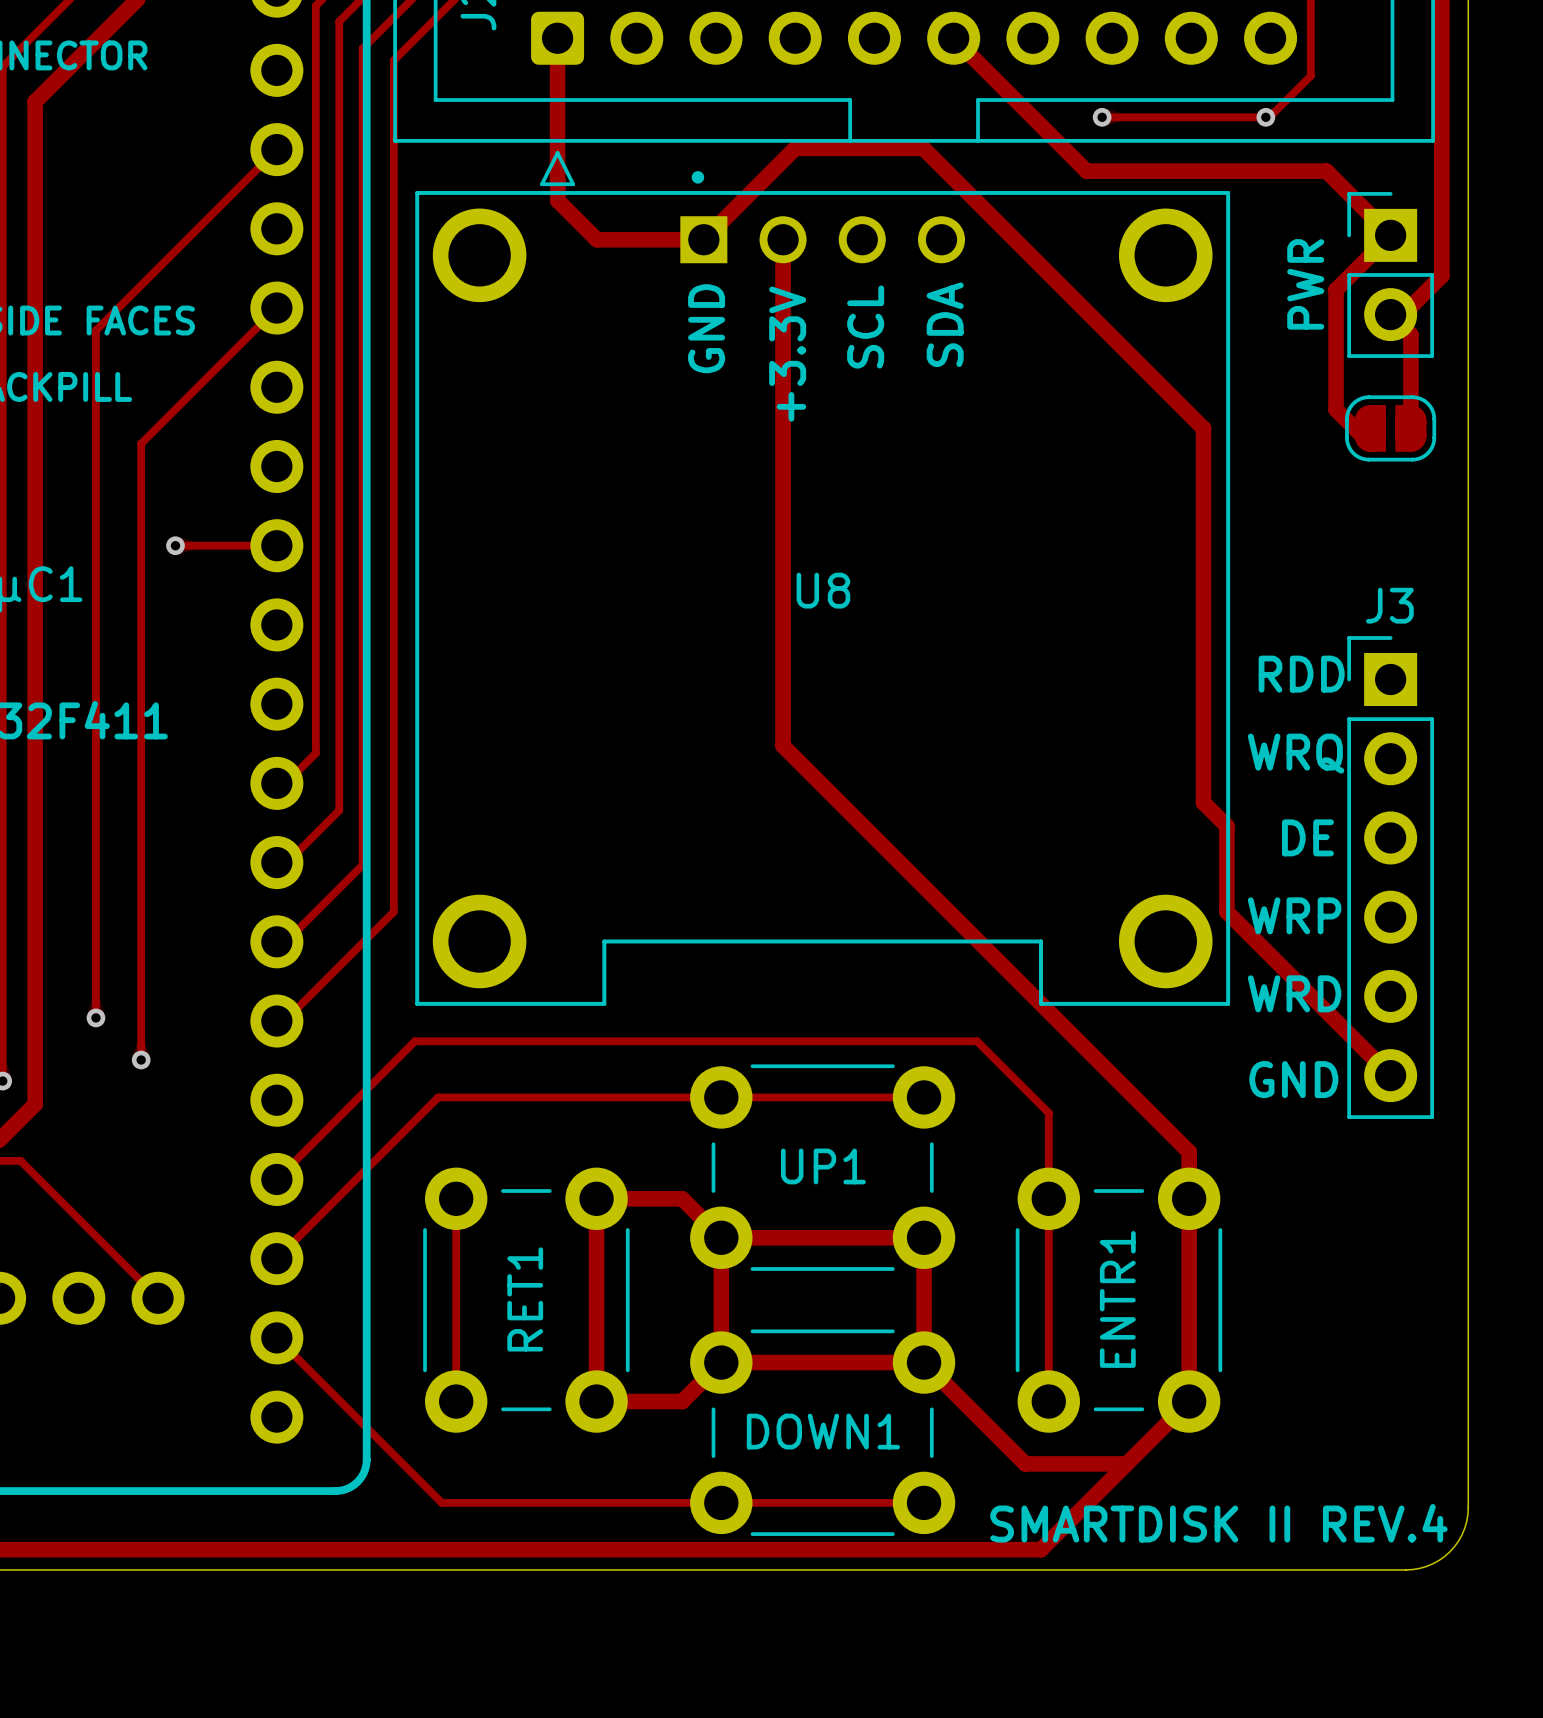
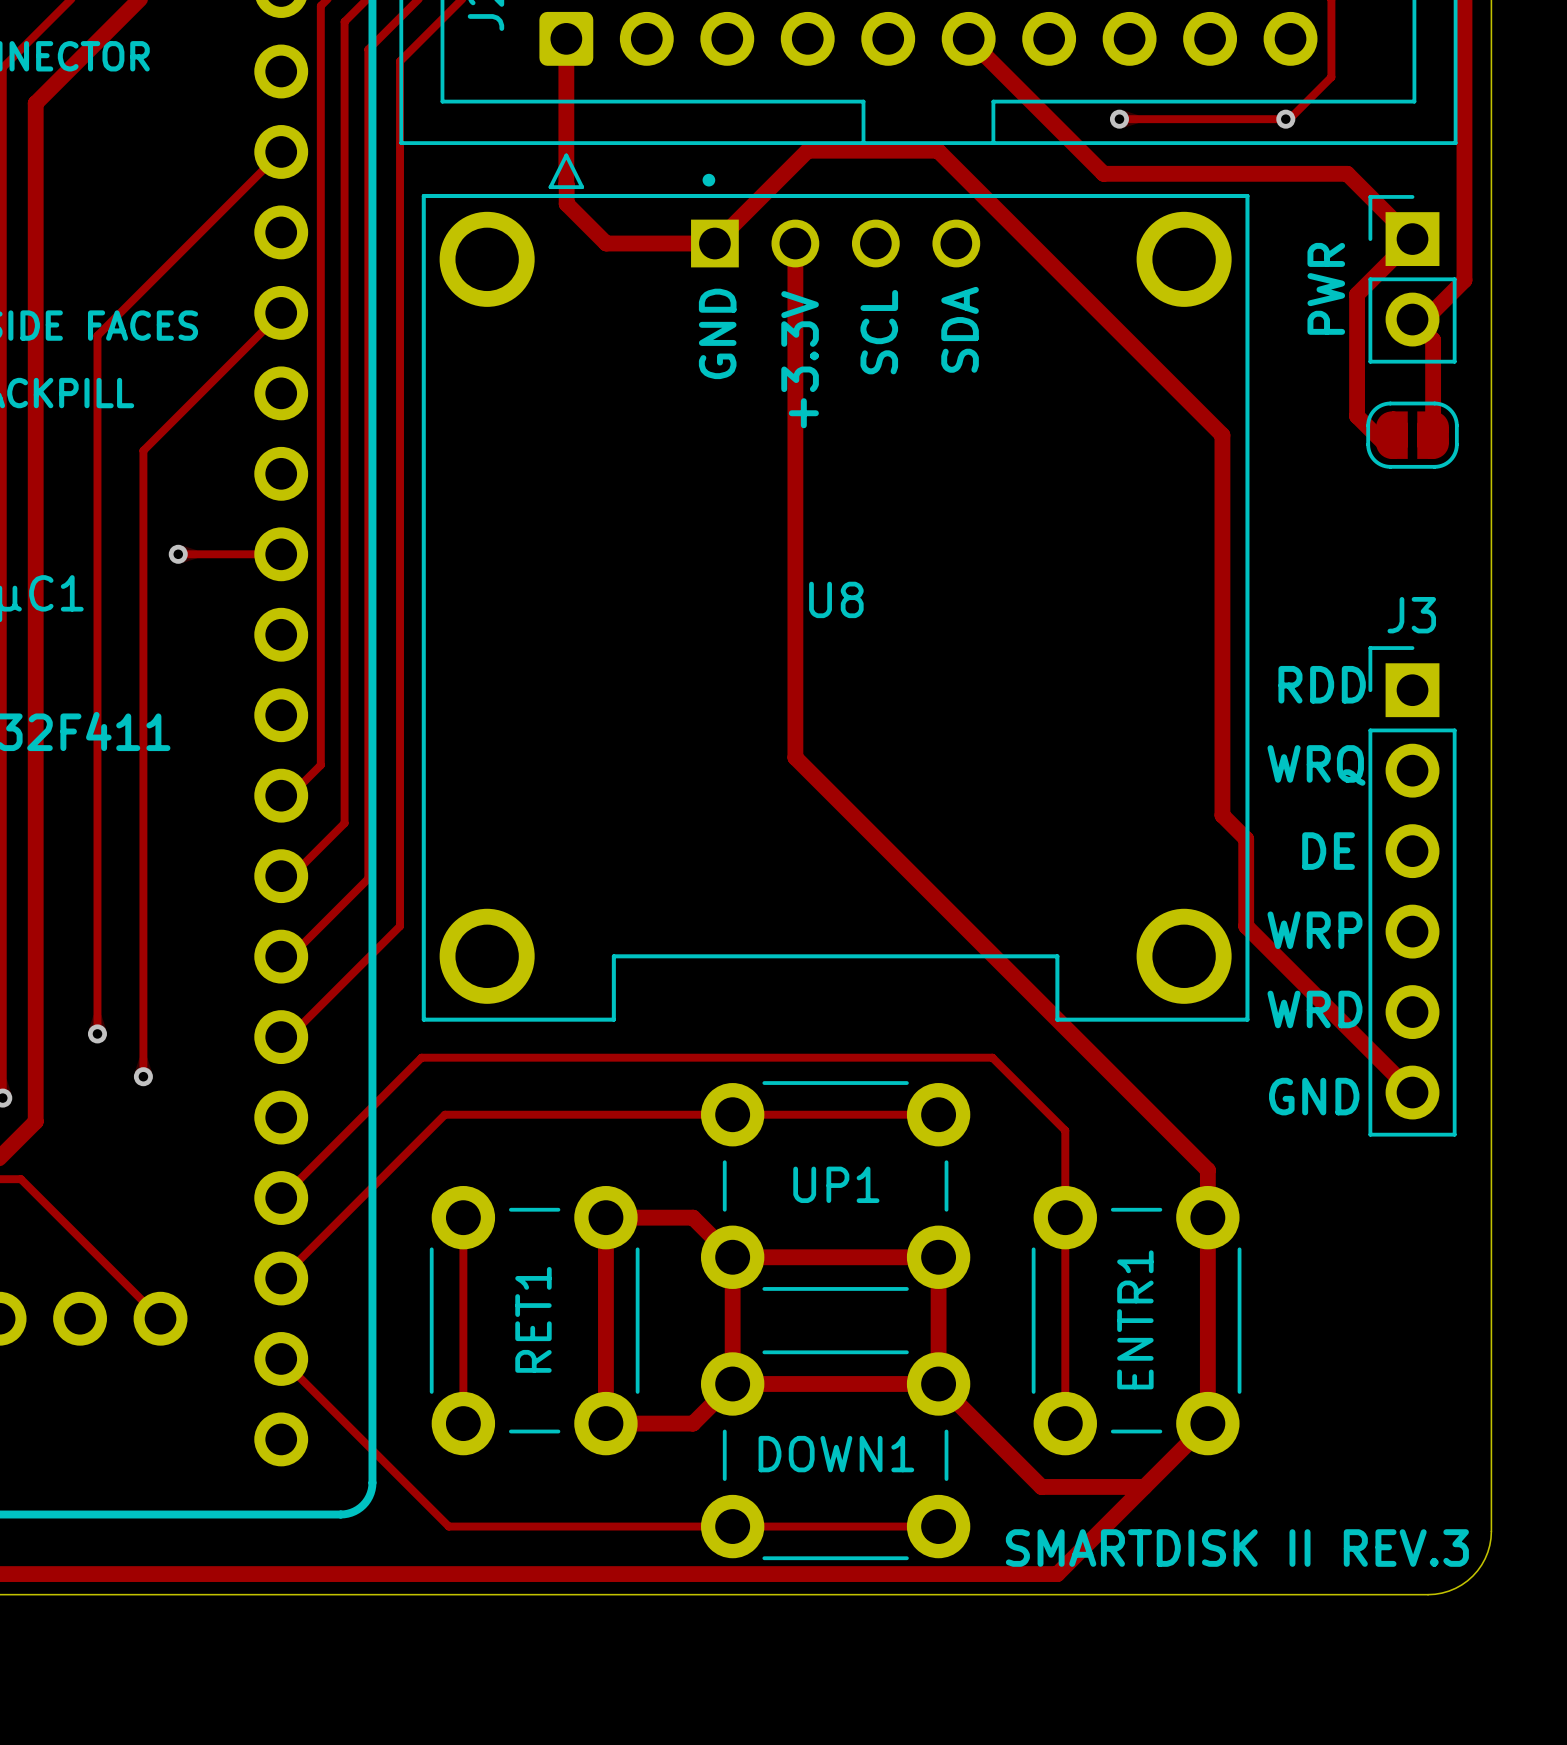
text: SMARTDISK II REV.4 (1218, 1523) -> SMARTDISK II REV.3 (1237, 1548)

